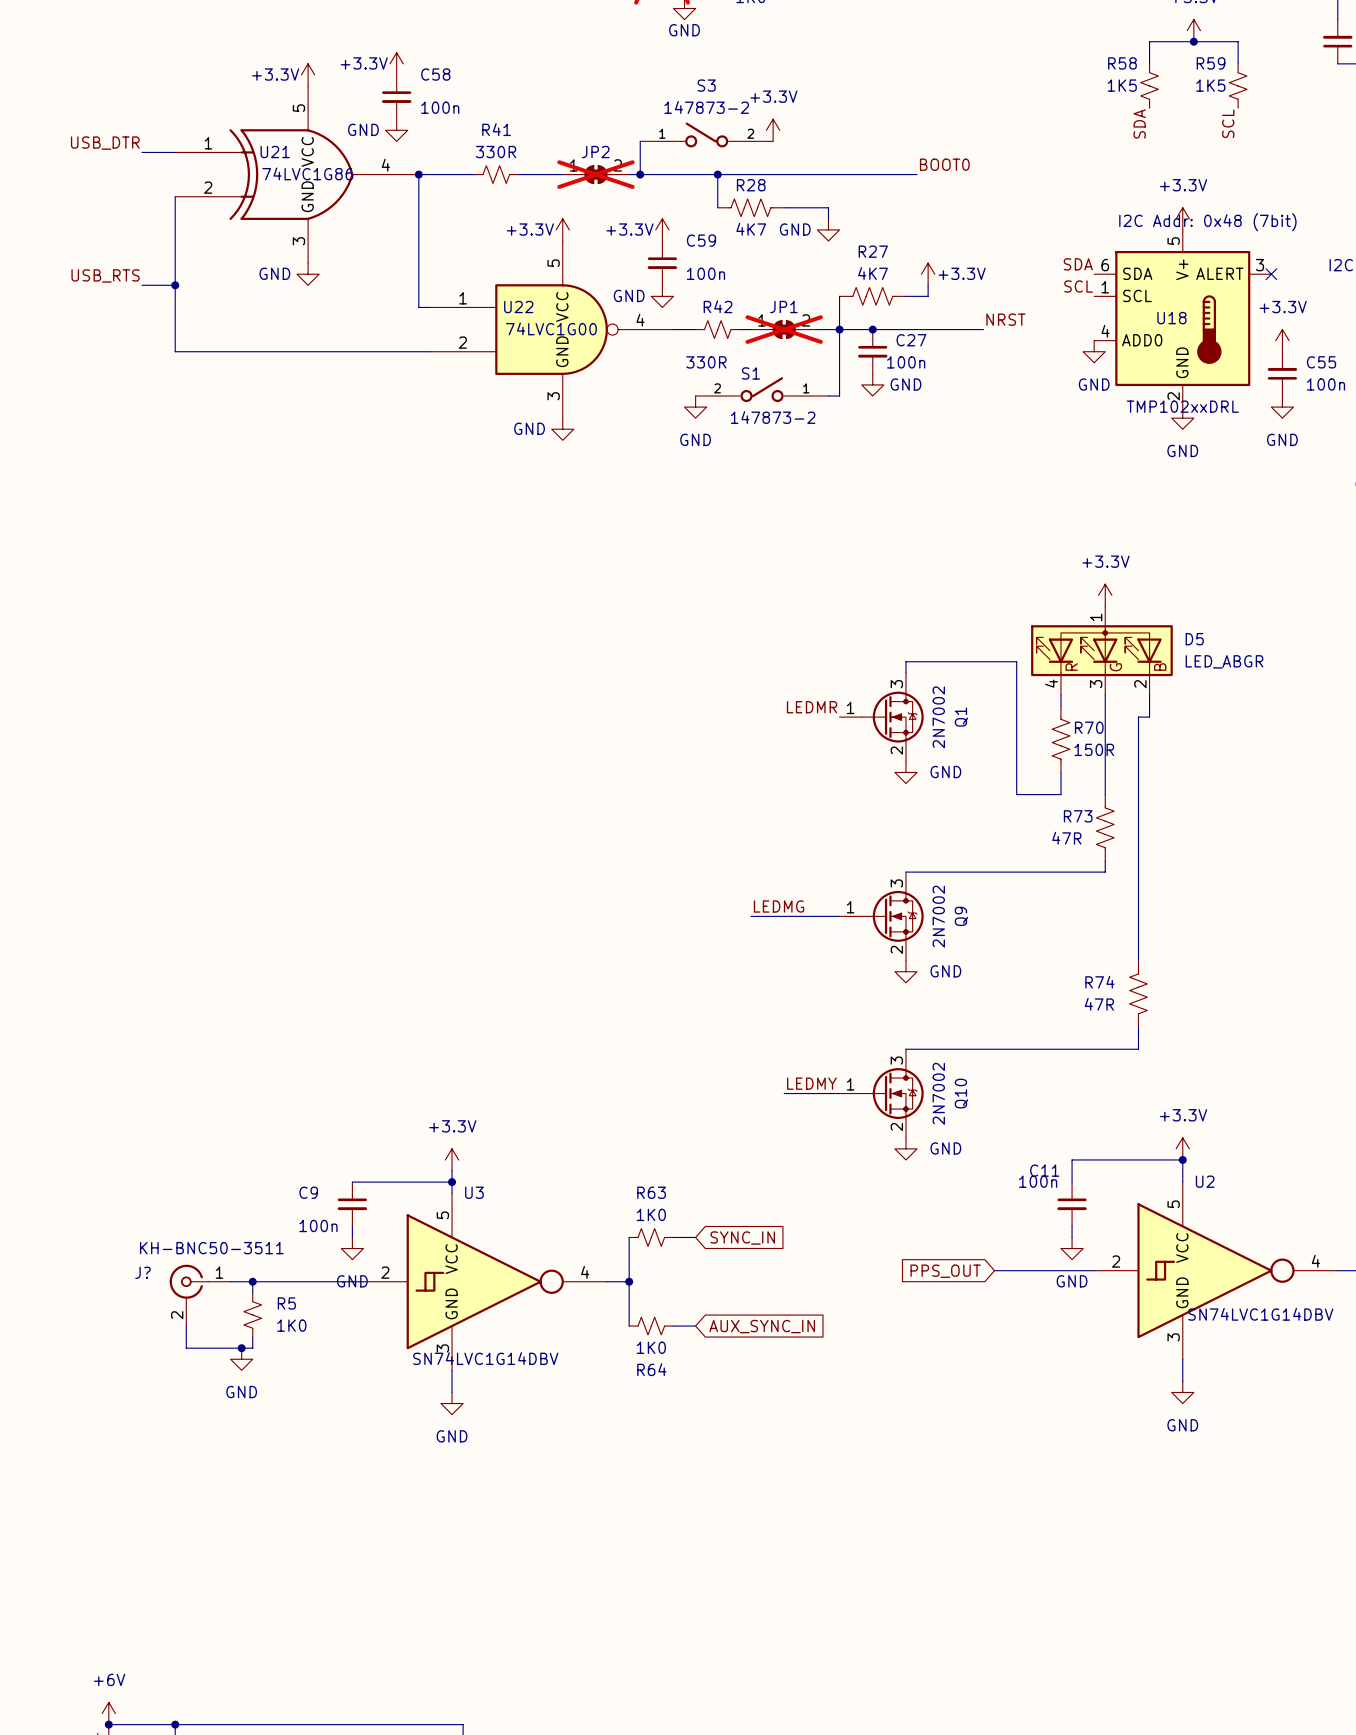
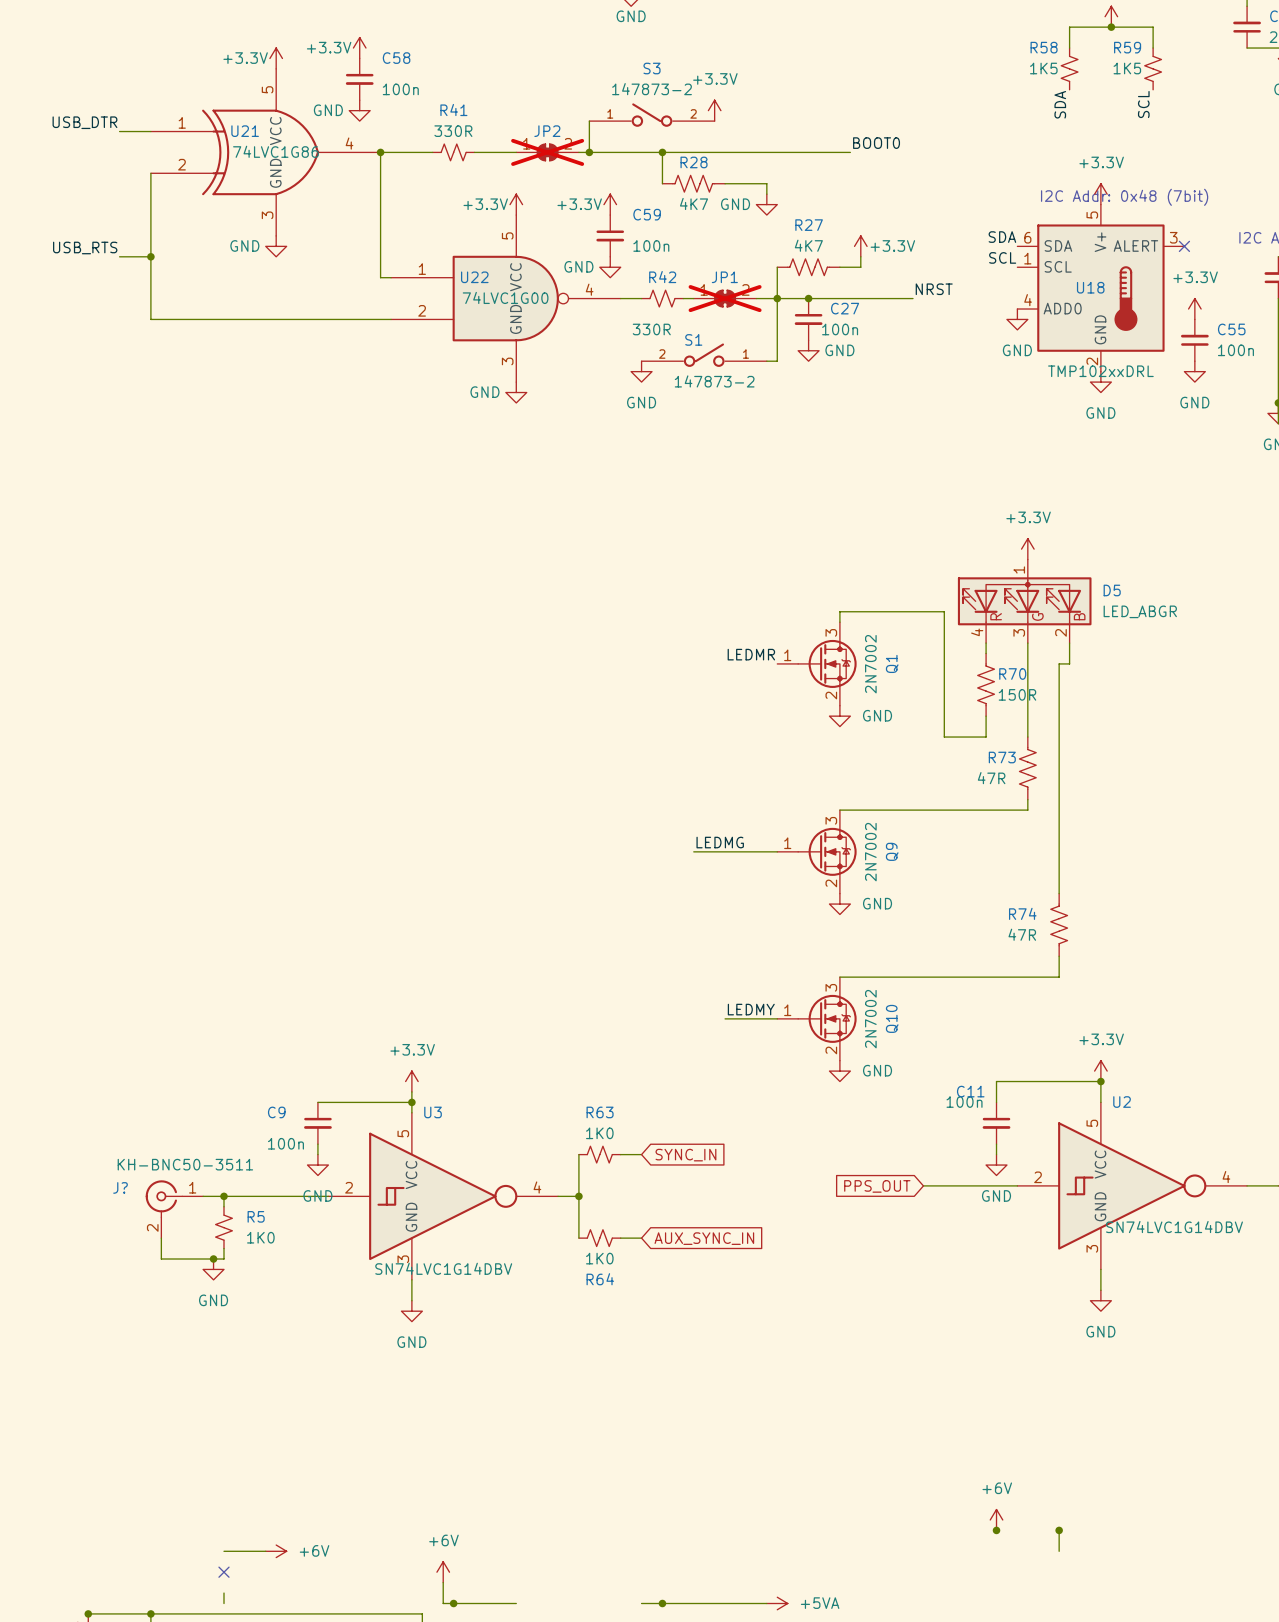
power symbol: none -> +6V (996, 1519)
junction: none -> (996, 1530)
wire: none -> (1059, 1530) (1059, 1551)
junction: none -> (1059, 1530)
wire: none -> (223, 1551) (265, 1551)
power symbol: none -> +6V (276, 1551)
no-connect mark: none -> (223, 1572)
power symbol: none -> +6V (443, 1572)
wire: none -> (443, 1582) (443, 1603) (516, 1603)
wire: none -> (223, 1593) (223, 1603)
power symbol: +6V (108, 1713) -> none
junction: none -> (453, 1603)
wire: none -> (641, 1603) (766, 1603)
junction: none -> (662, 1603)
power symbol: none -> +5VA (777, 1603)

